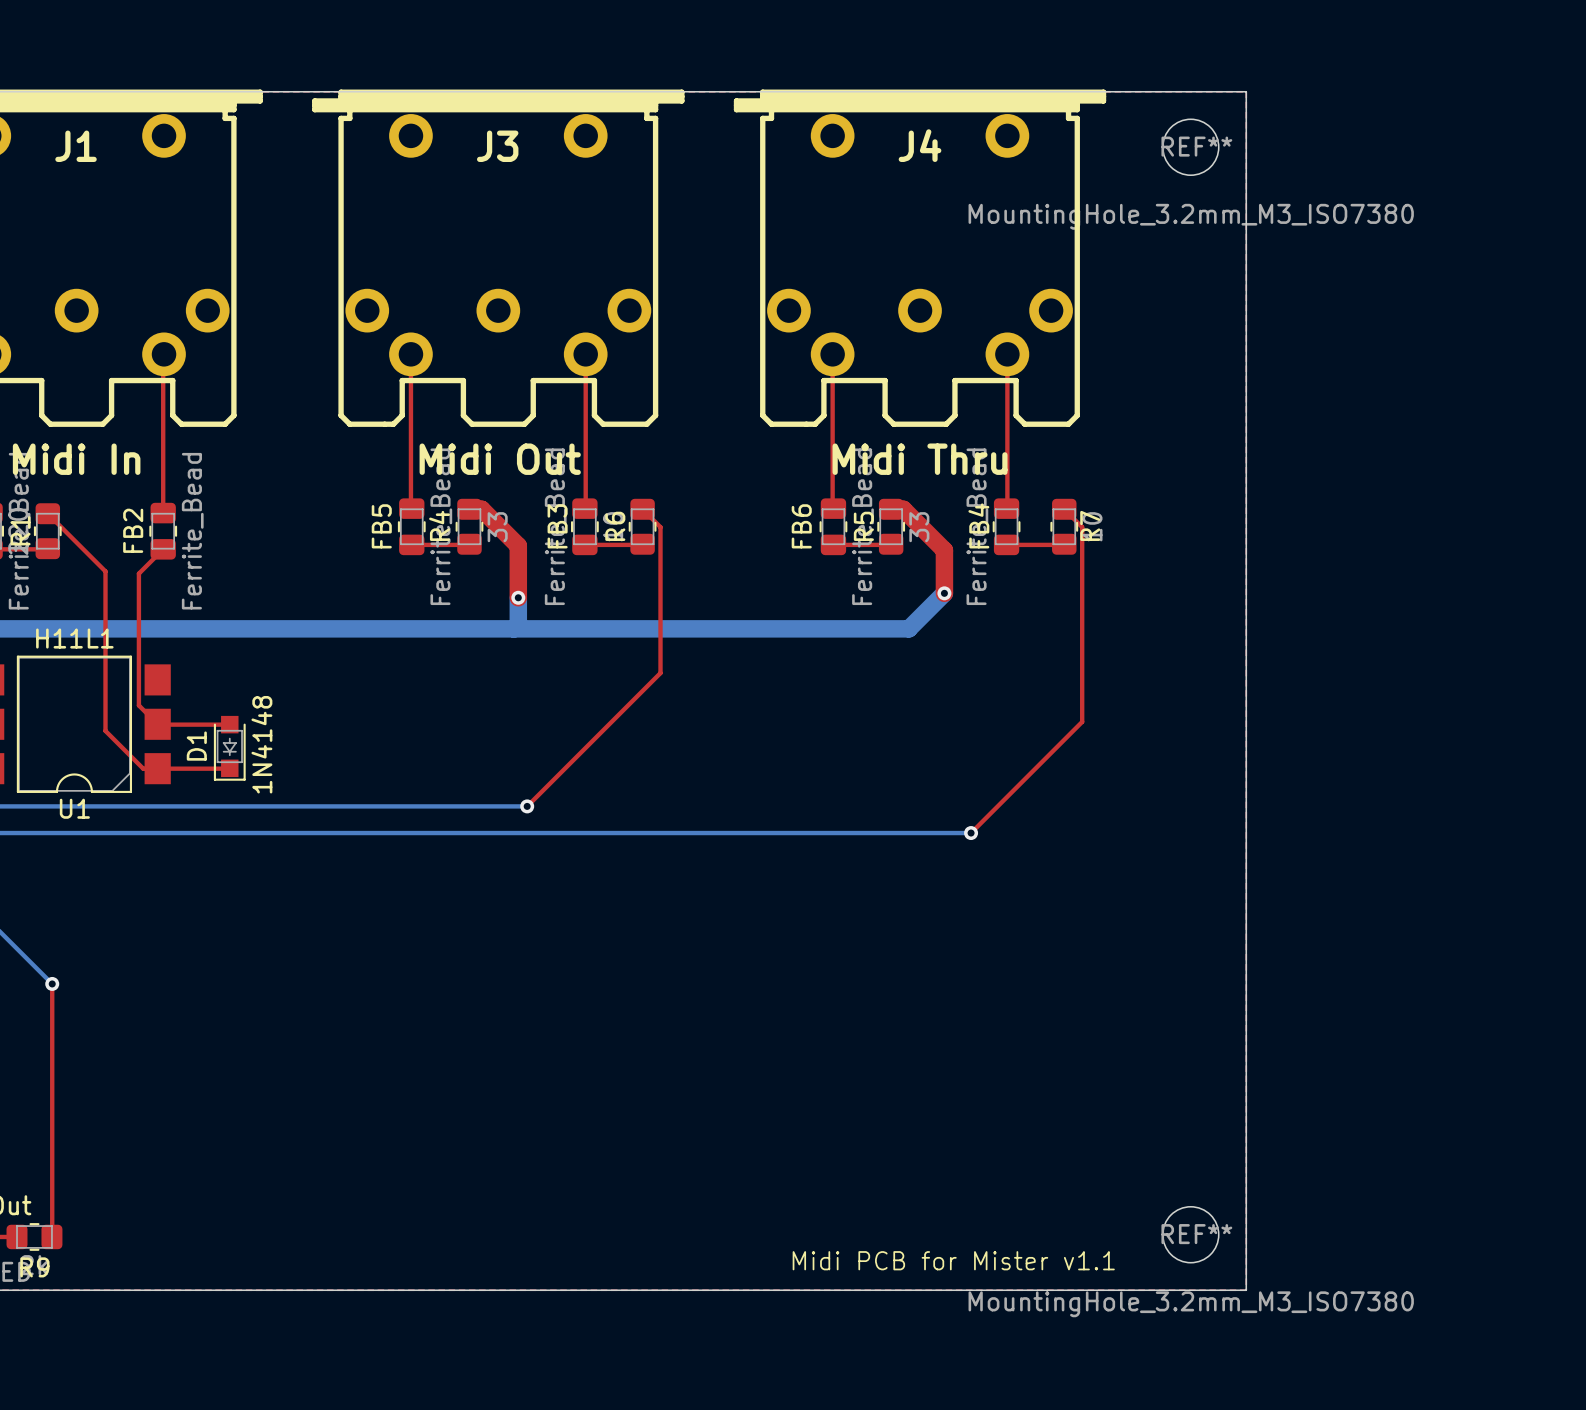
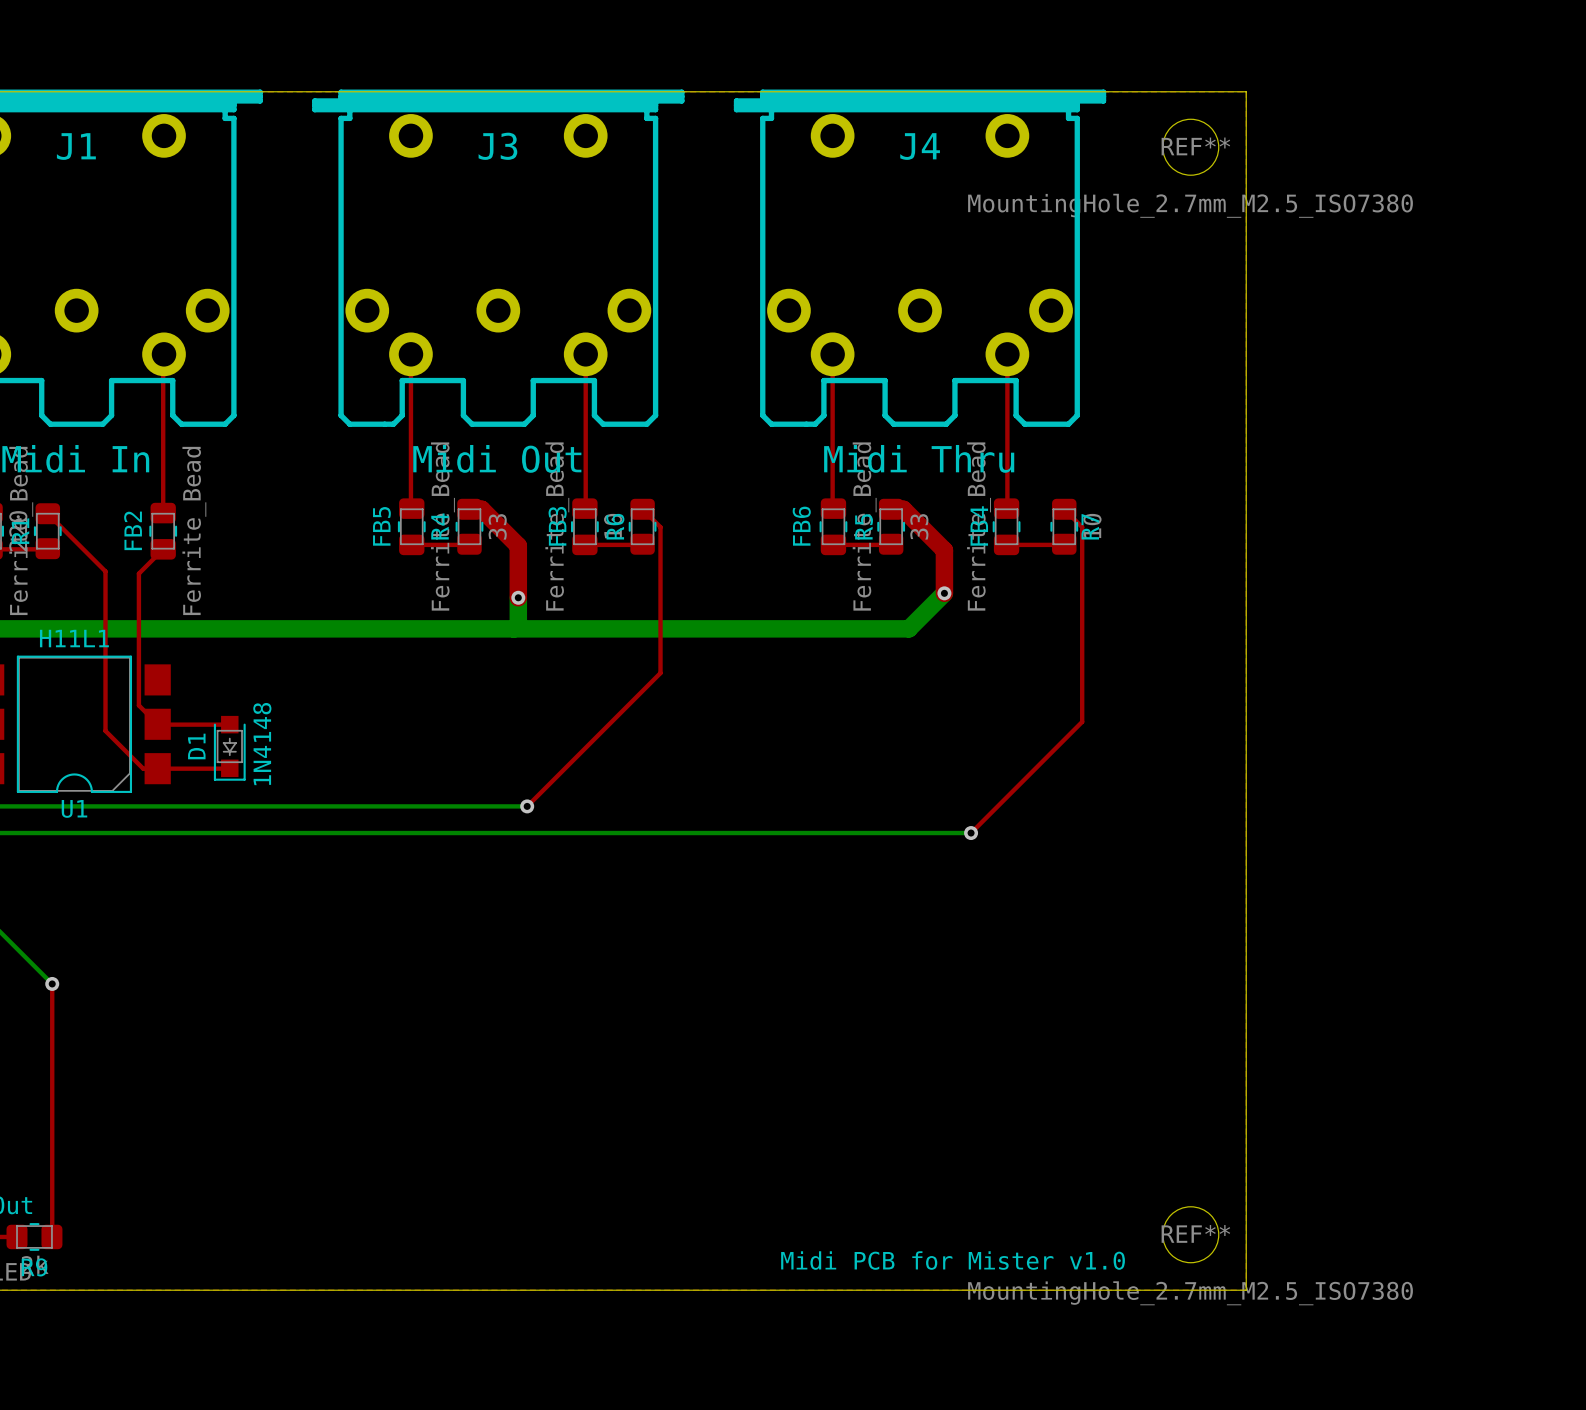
REF** value: MountingHole_3.2mm_M3_ISO7380 (1191, 216) -> MountingHole_2.7mm_M2.5_ISO7380 (1190, 205)
text: Midi PCB for Mister v1.1 (953, 1260) -> Midi PCB for Mister v1.0 (953, 1260)
REF** value: MountingHole_3.2mm_M3_ISO7380 (1191, 1304) -> MountingHole_2.7mm_M2.5_ISO7380 (1190, 1293)

